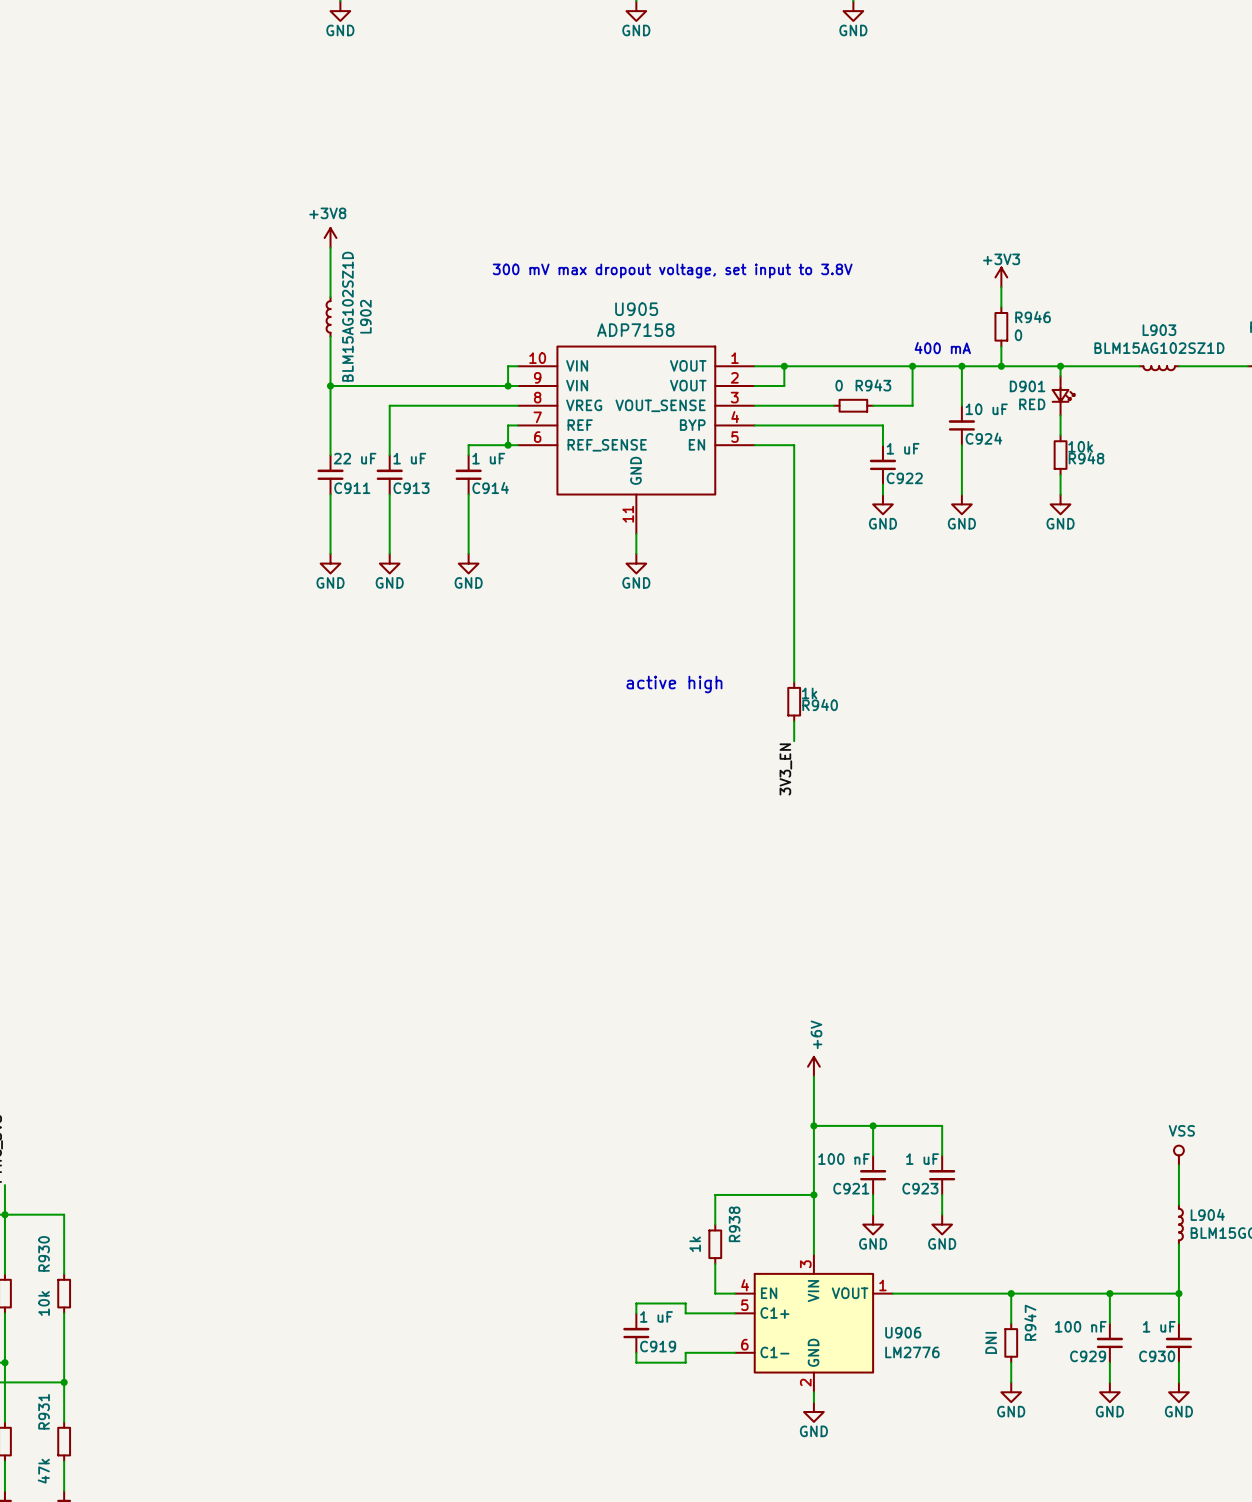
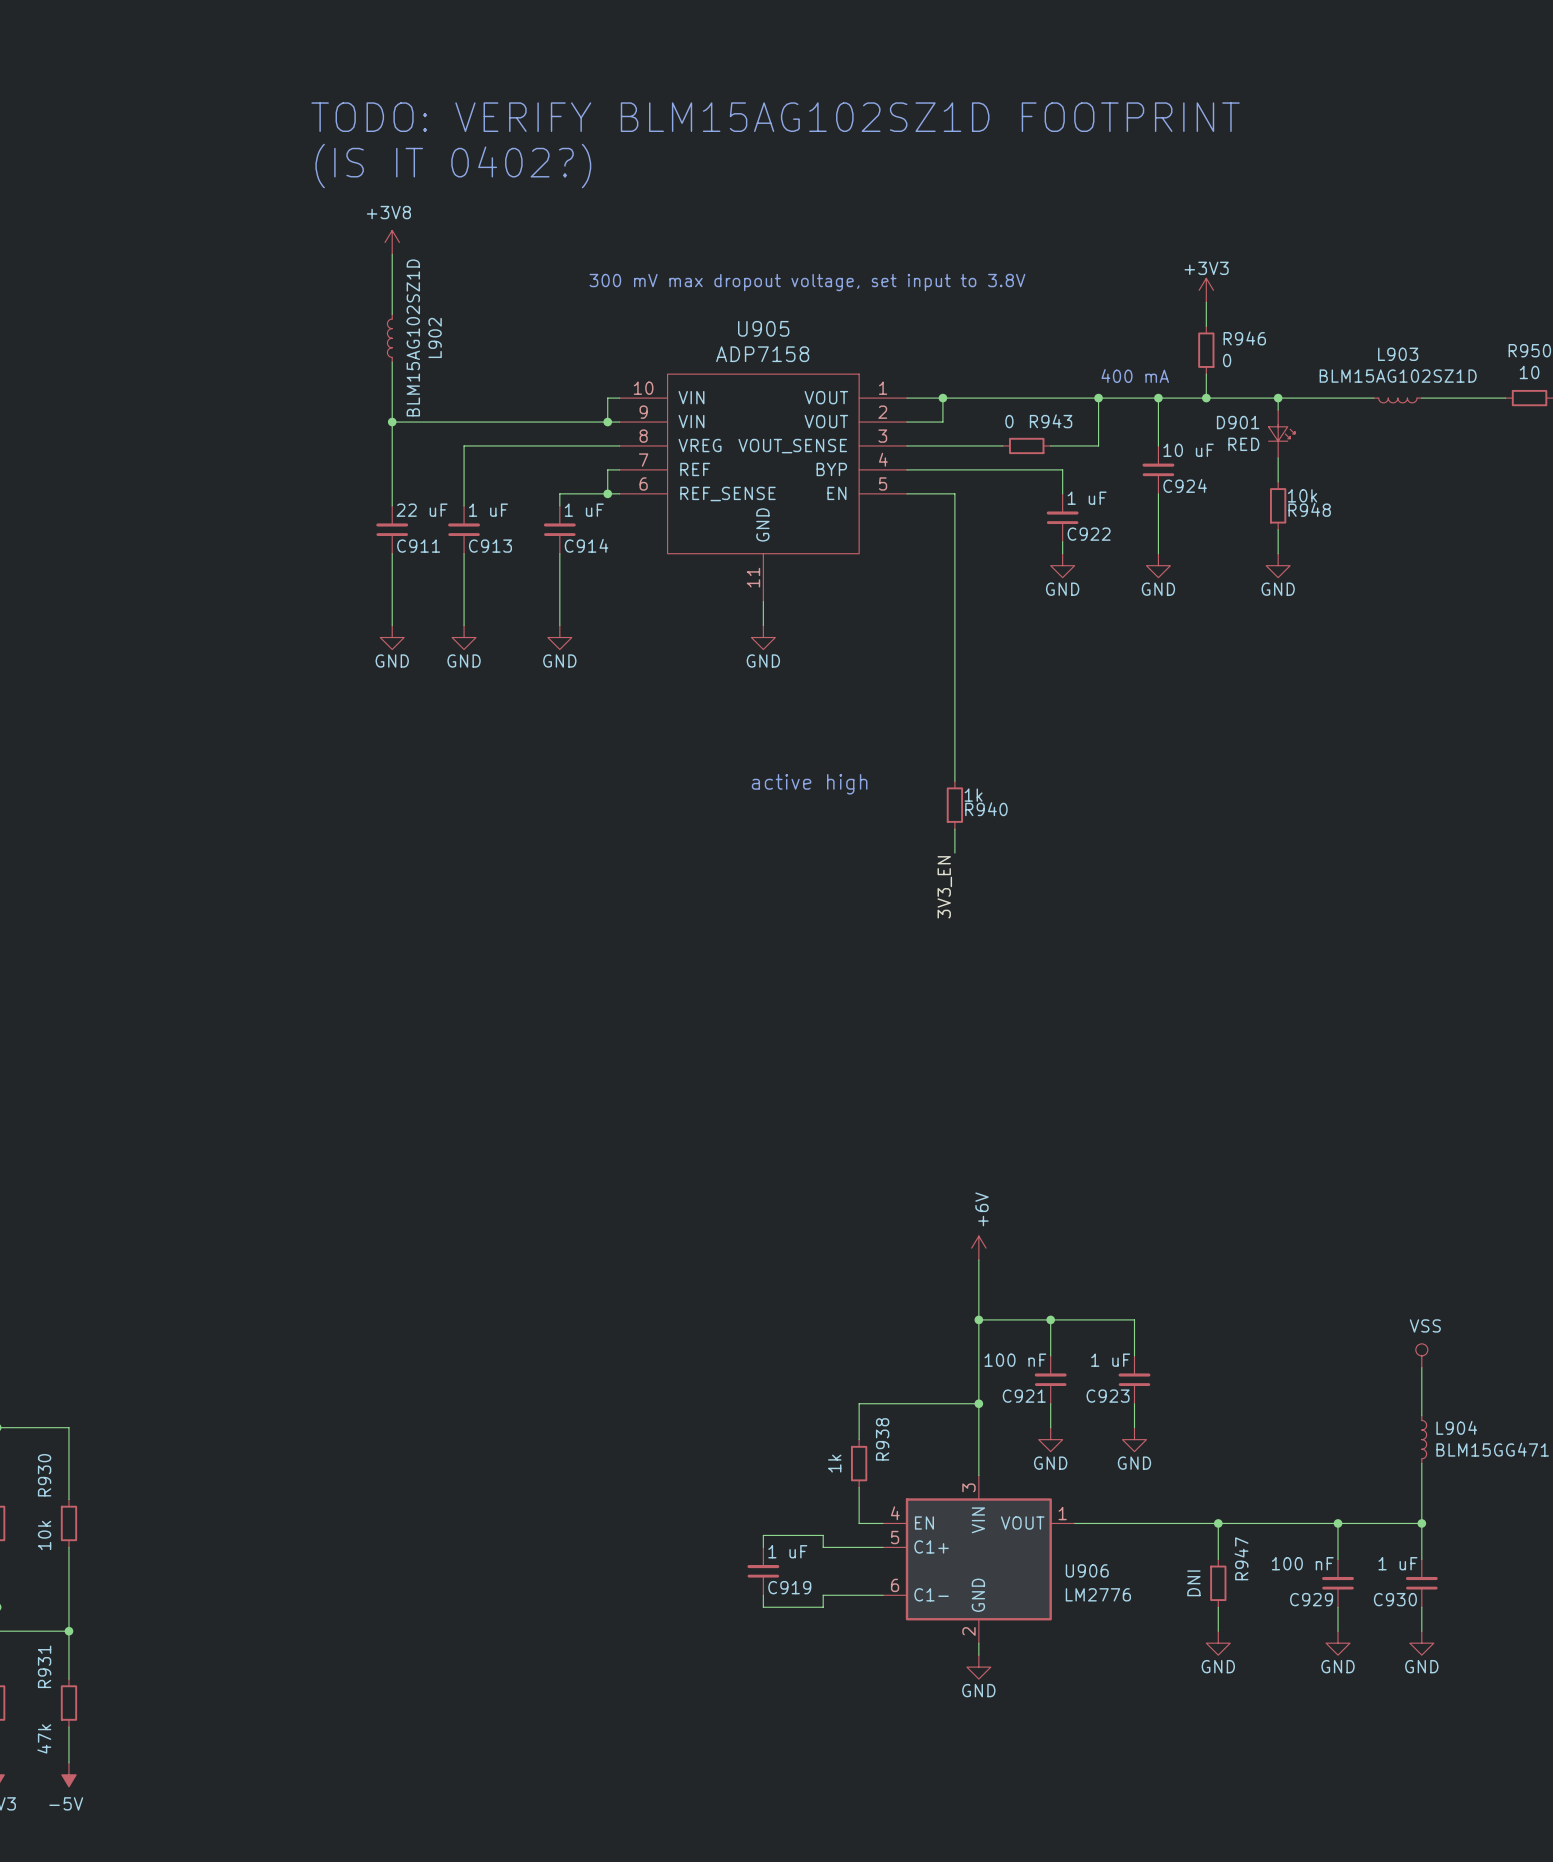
text: none -> TODO: VERIFY BLM15AG102SZ1D FOOTPRINT (775, 117)
text: none -> (IS IT 0402?) (453, 166)

